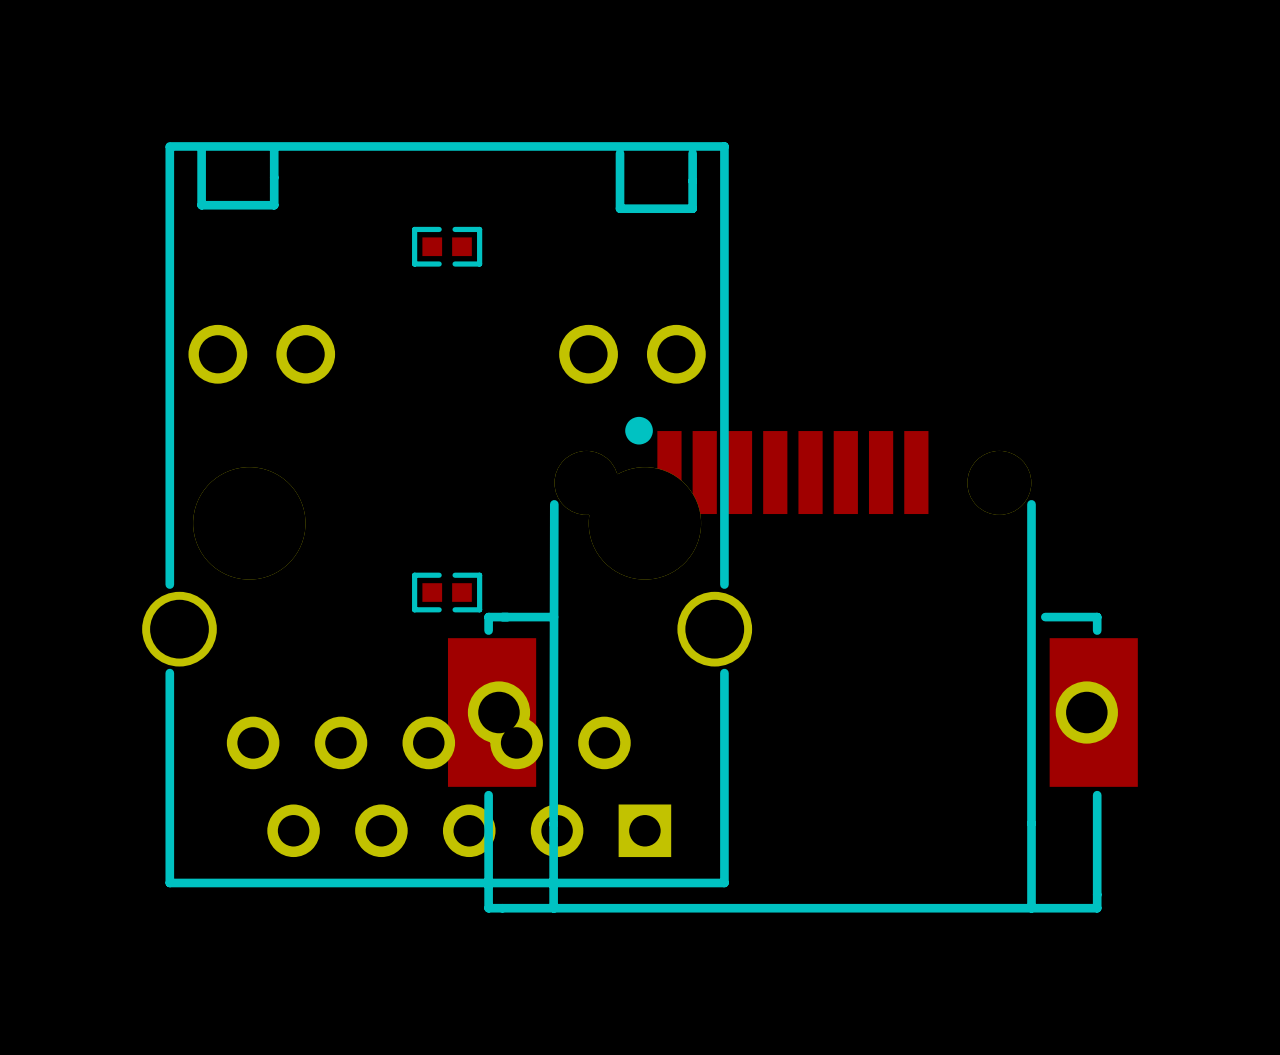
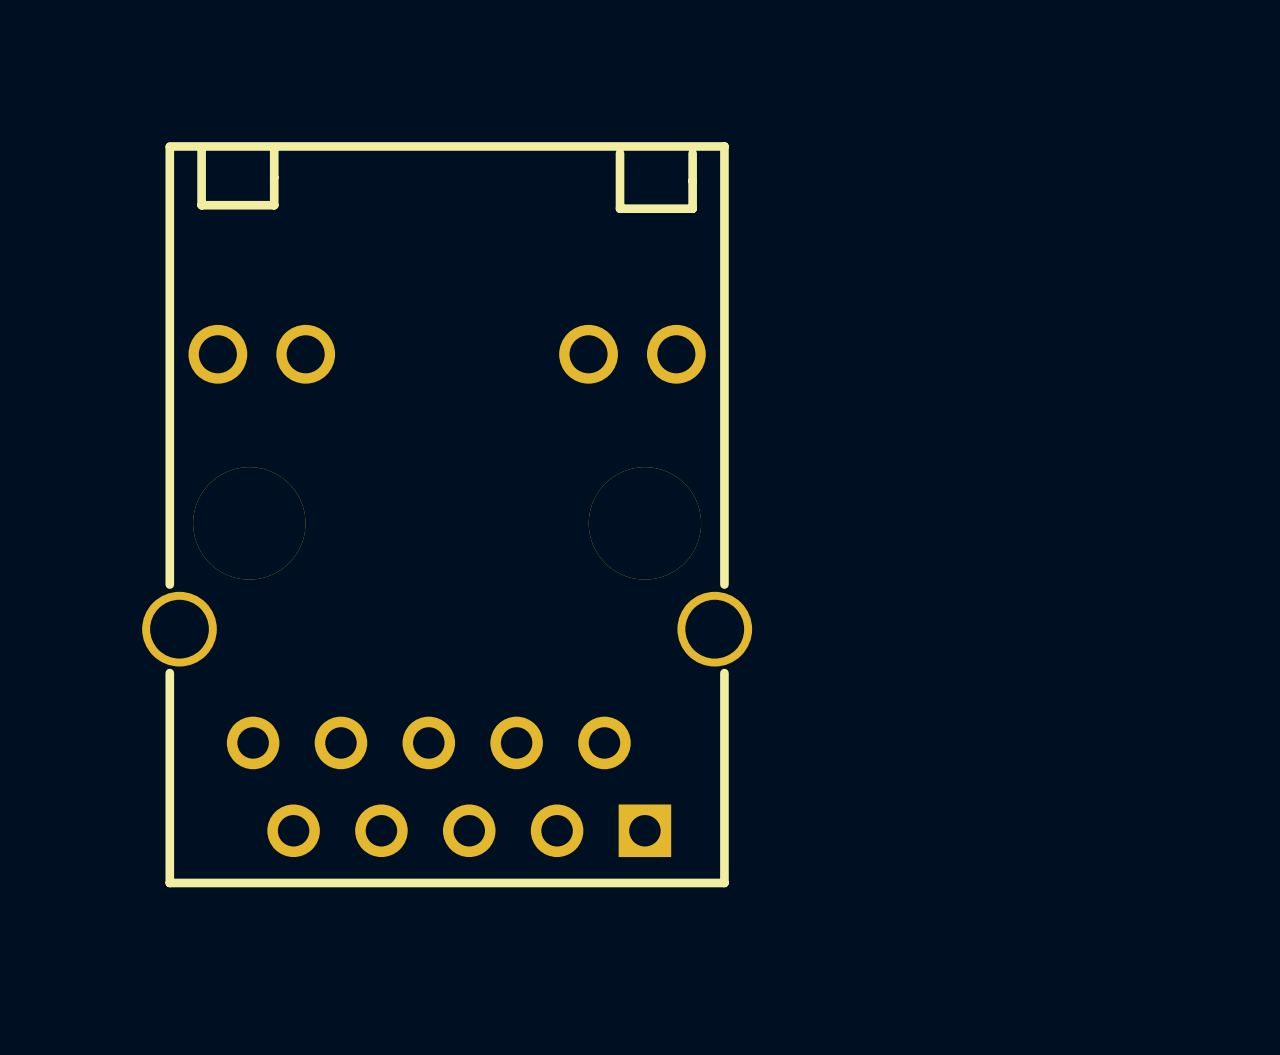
part: (447, 246) -> none
part: (447, 592) -> none
part: (792, 664) -> none

